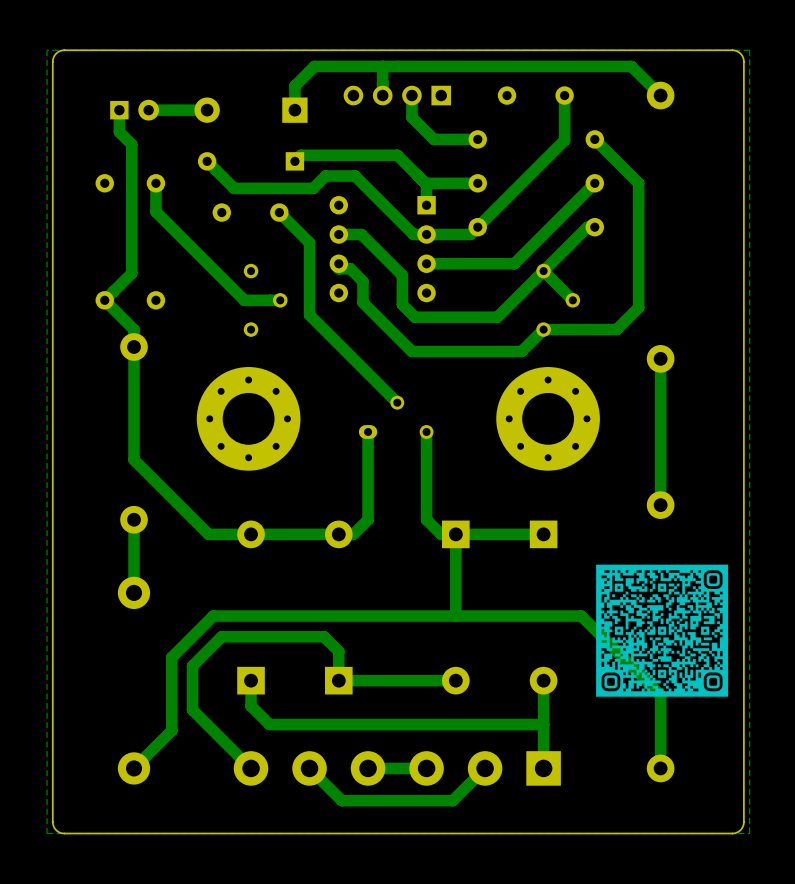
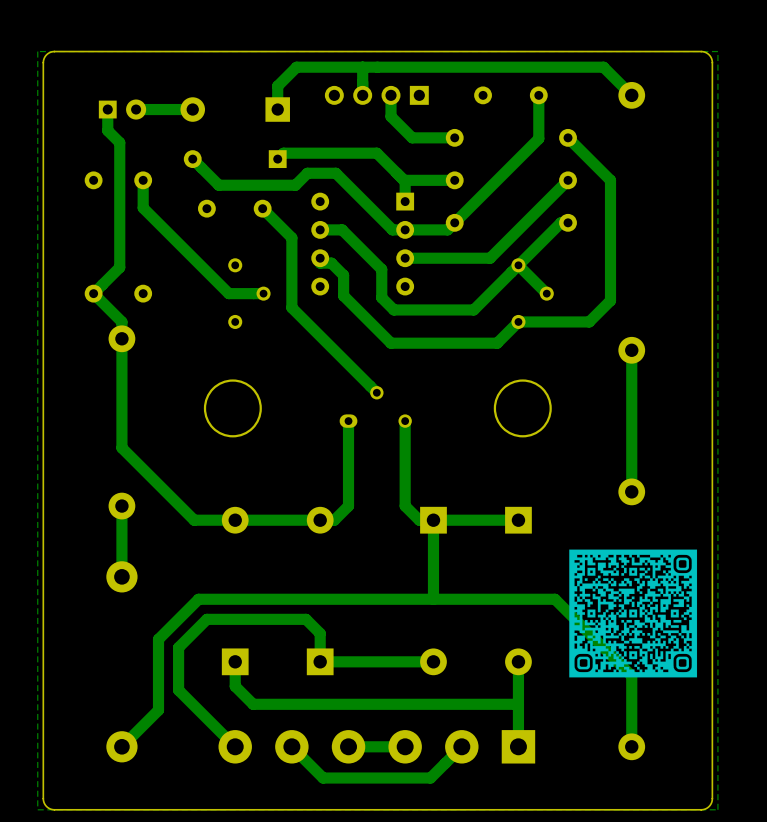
round board edge: none -> [203, 379, 262, 438]
round board edge: none -> [493, 379, 552, 438]
part: (248, 418) -> none
part: (548, 418) -> none

